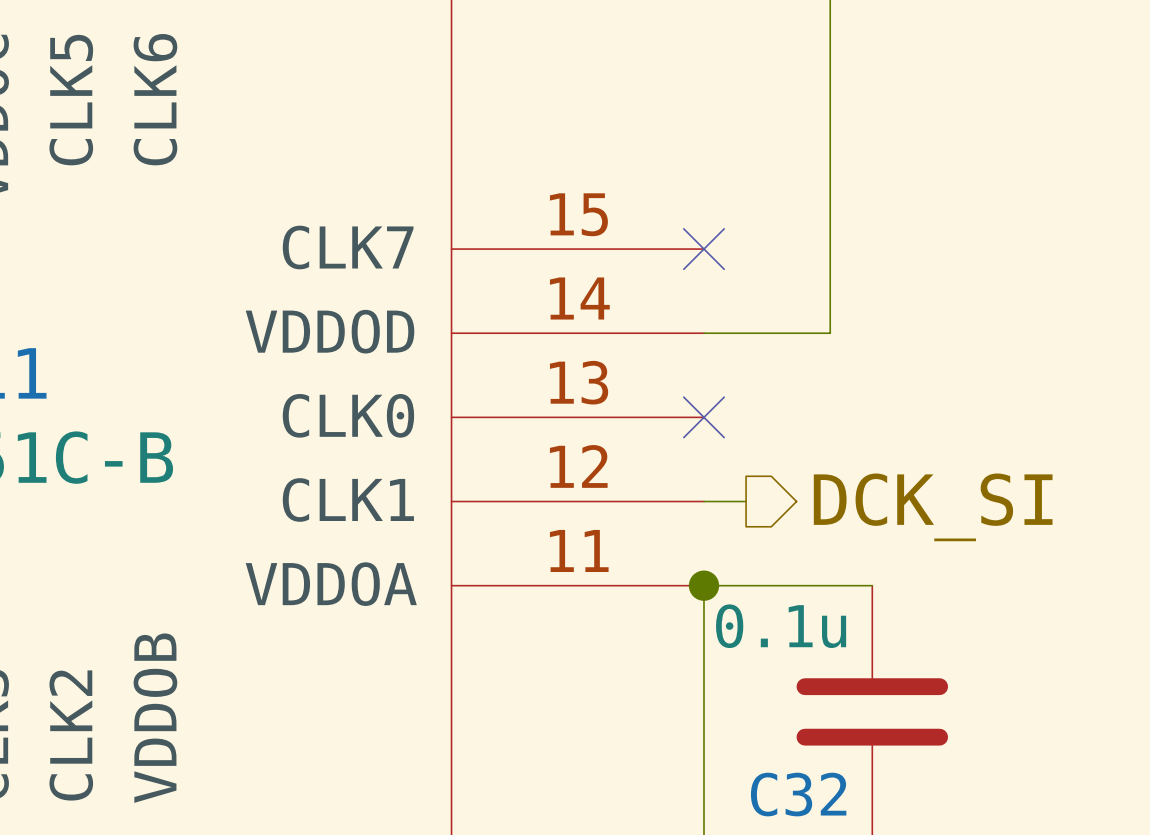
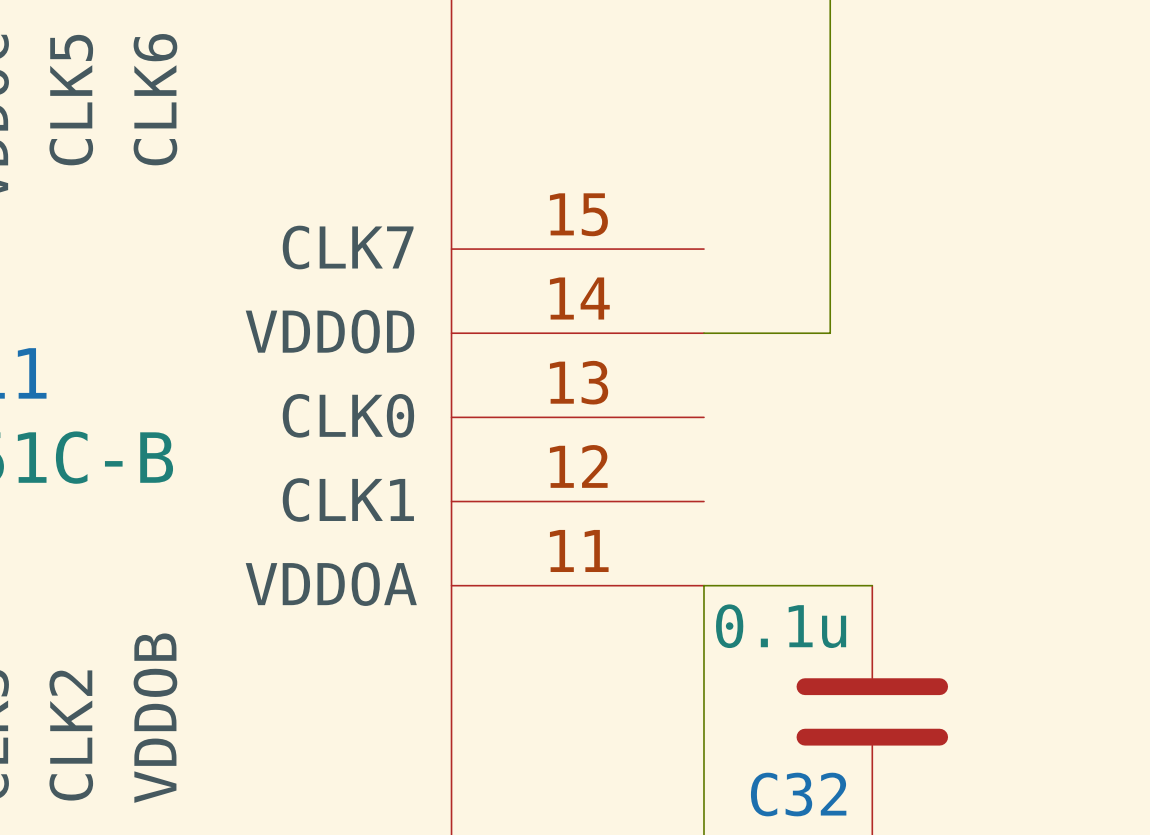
no-connect mark: (703, 249) -> none
no-connect mark: (703, 417) -> none
wire: (703, 501) (746, 501) -> none
hierarchical label: DCK_SI (933, 507) -> none
junction: (703, 585) -> none

